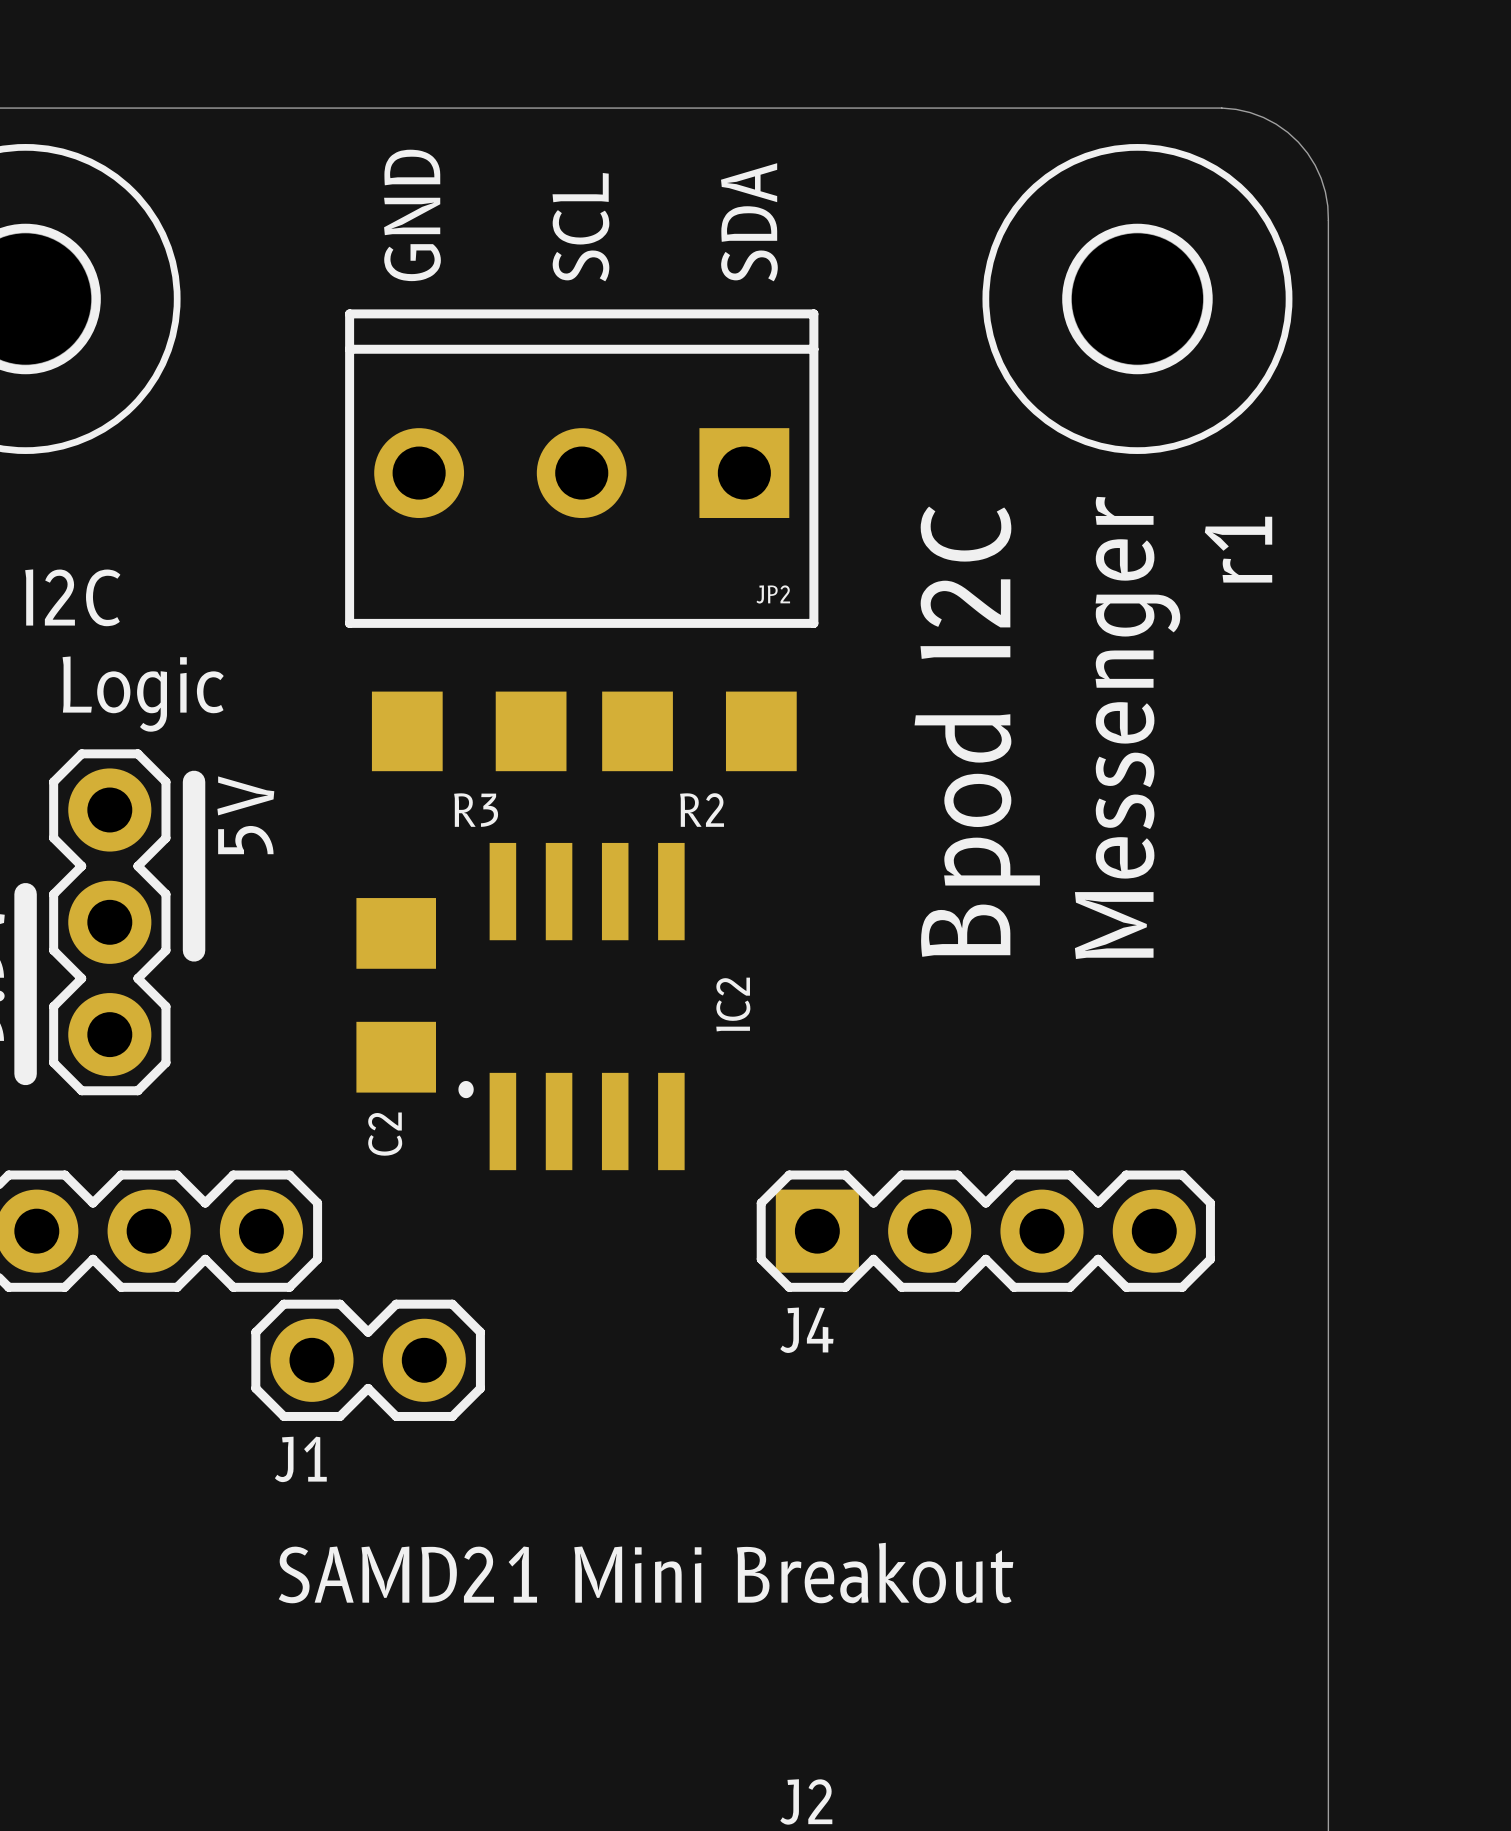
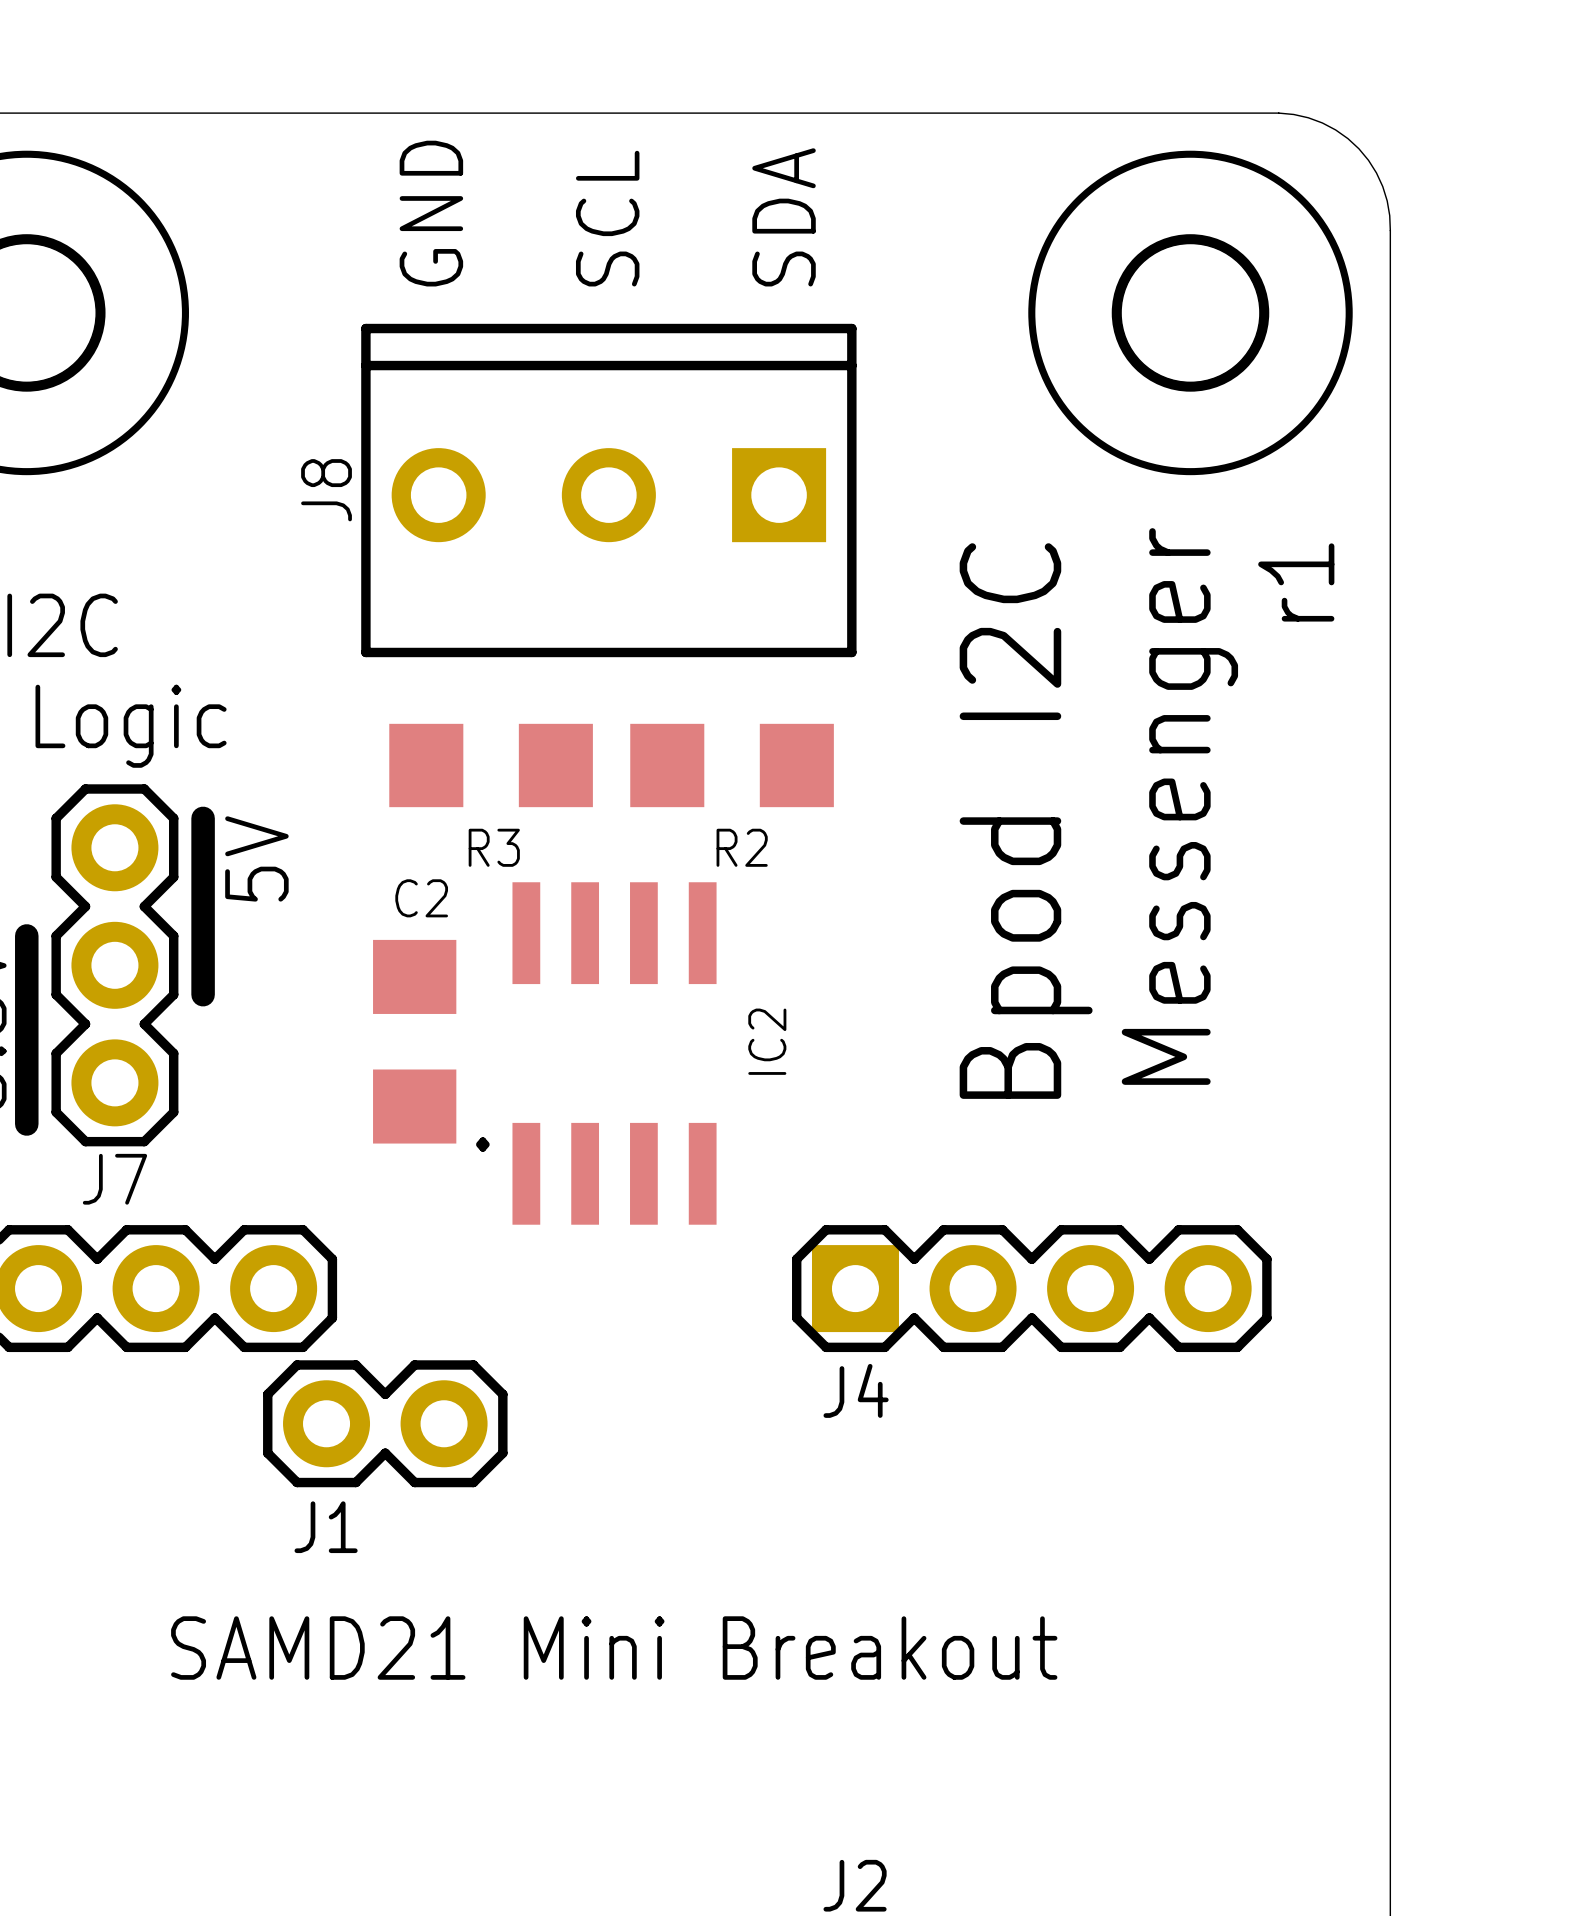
JP2 name: JP2 (773, 594) -> J8 (326, 490)
J7 name: none -> J7 (114, 1179)
C2 name rotation: 0° (385, 1134) -> 90° clockwise (421, 898)
C2 name position: C2 (385, 1134) -> C2 (421, 898)

